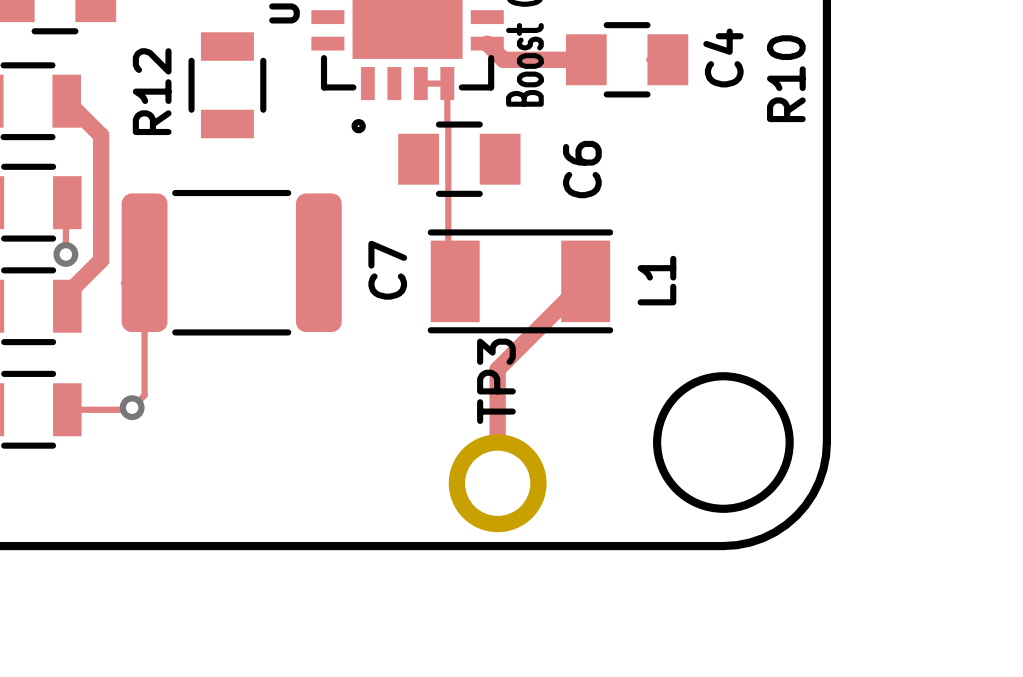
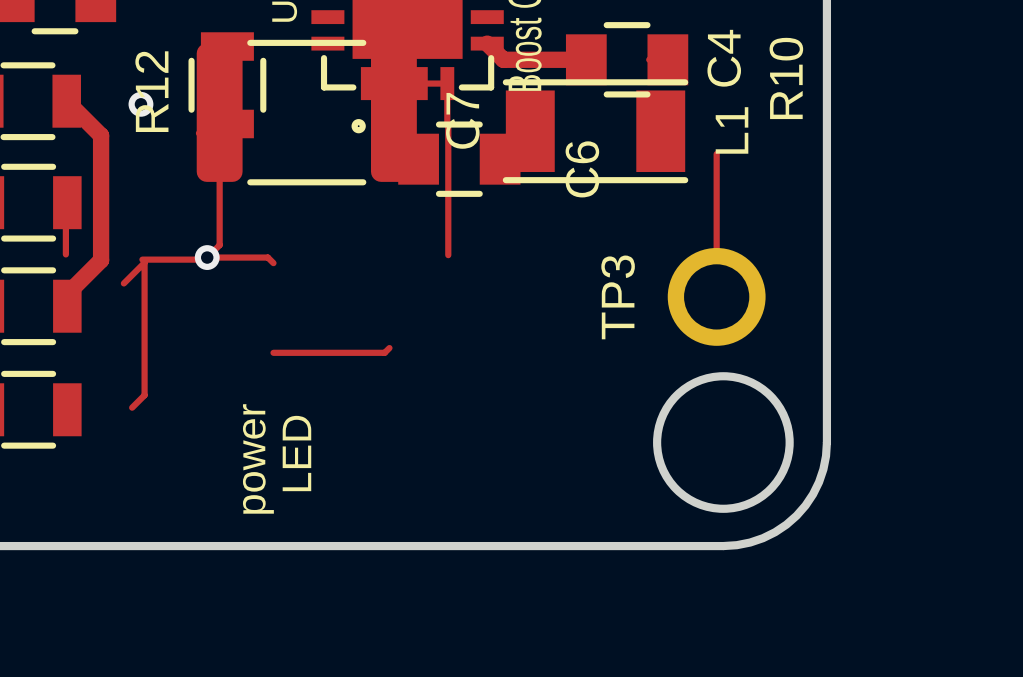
via: none -> (140, 104)
top track: none -> (198, 133) (219, 112) (219, 245) (207, 257) (267, 257) (273, 263)
top track: none -> (716, 154) (716, 334)
via: (65, 254) -> none
via: none -> (207, 257)
C7 position: (231, 262) -> (306, 112)
L1 position: (520, 281) -> (595, 131)
top track: (585, 281) (497, 369) (497, 483) -> none
top track: none -> (389, 348) (384, 352) (273, 352)
TP3 name position: TP3 (496, 381) -> TP3 (618, 297)
via: (132, 407) -> none
top track: (67, 409) (121, 409) -> (142, 259) (196, 259)
text: none -> LED (296, 453)
text: none -> power (258, 458)
TP3 position: (497, 483) -> (716, 296)

